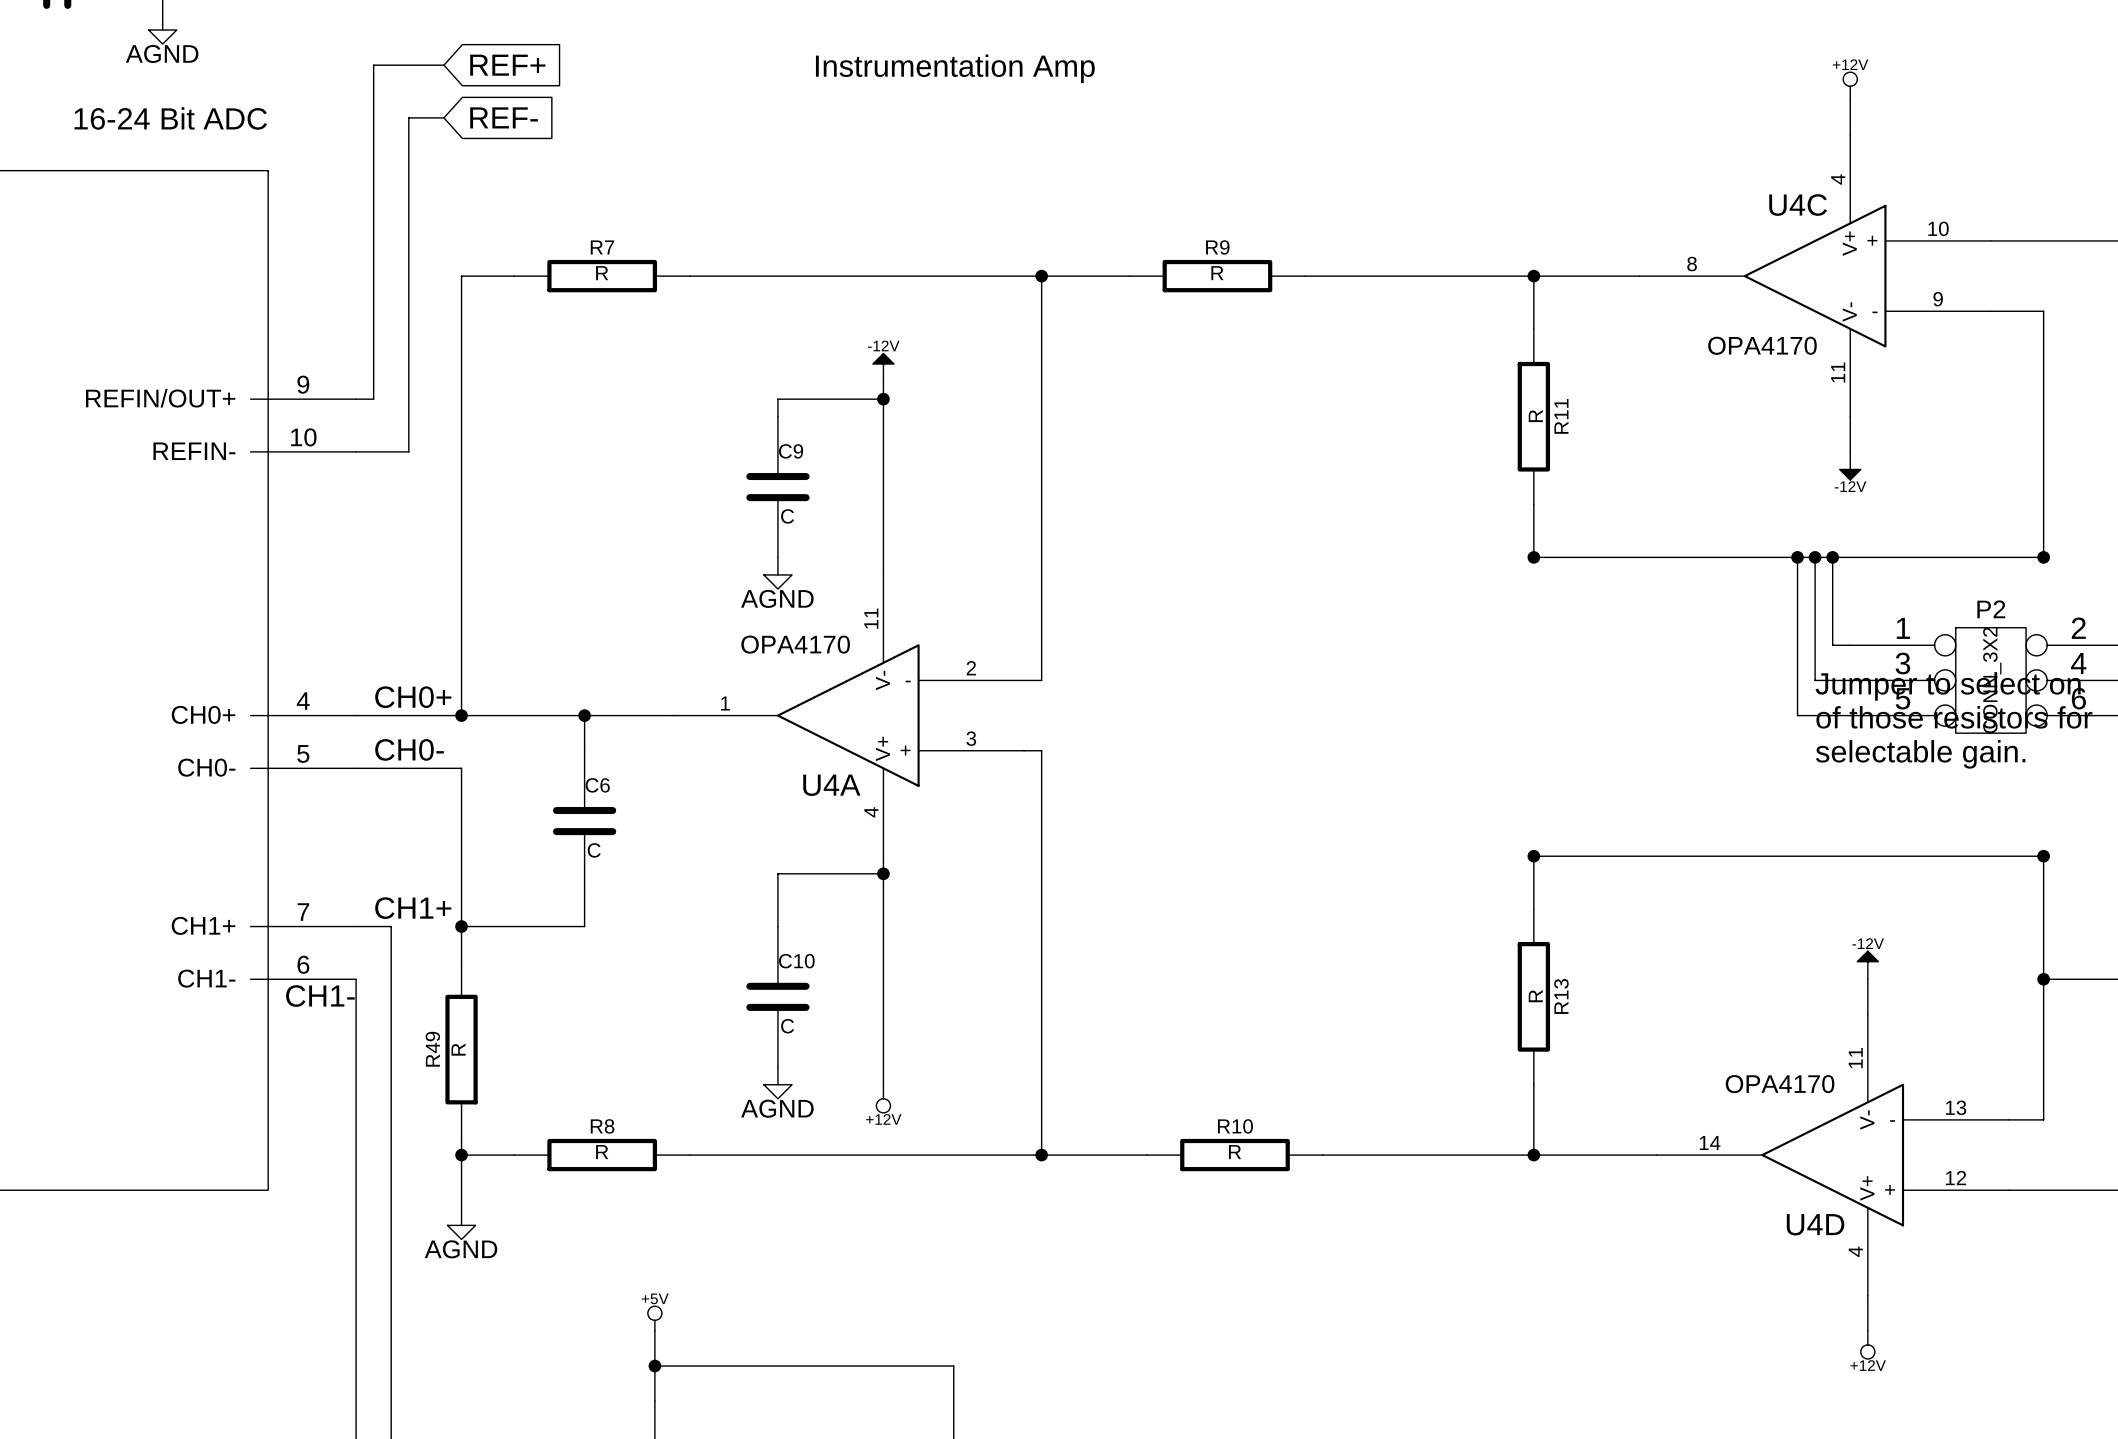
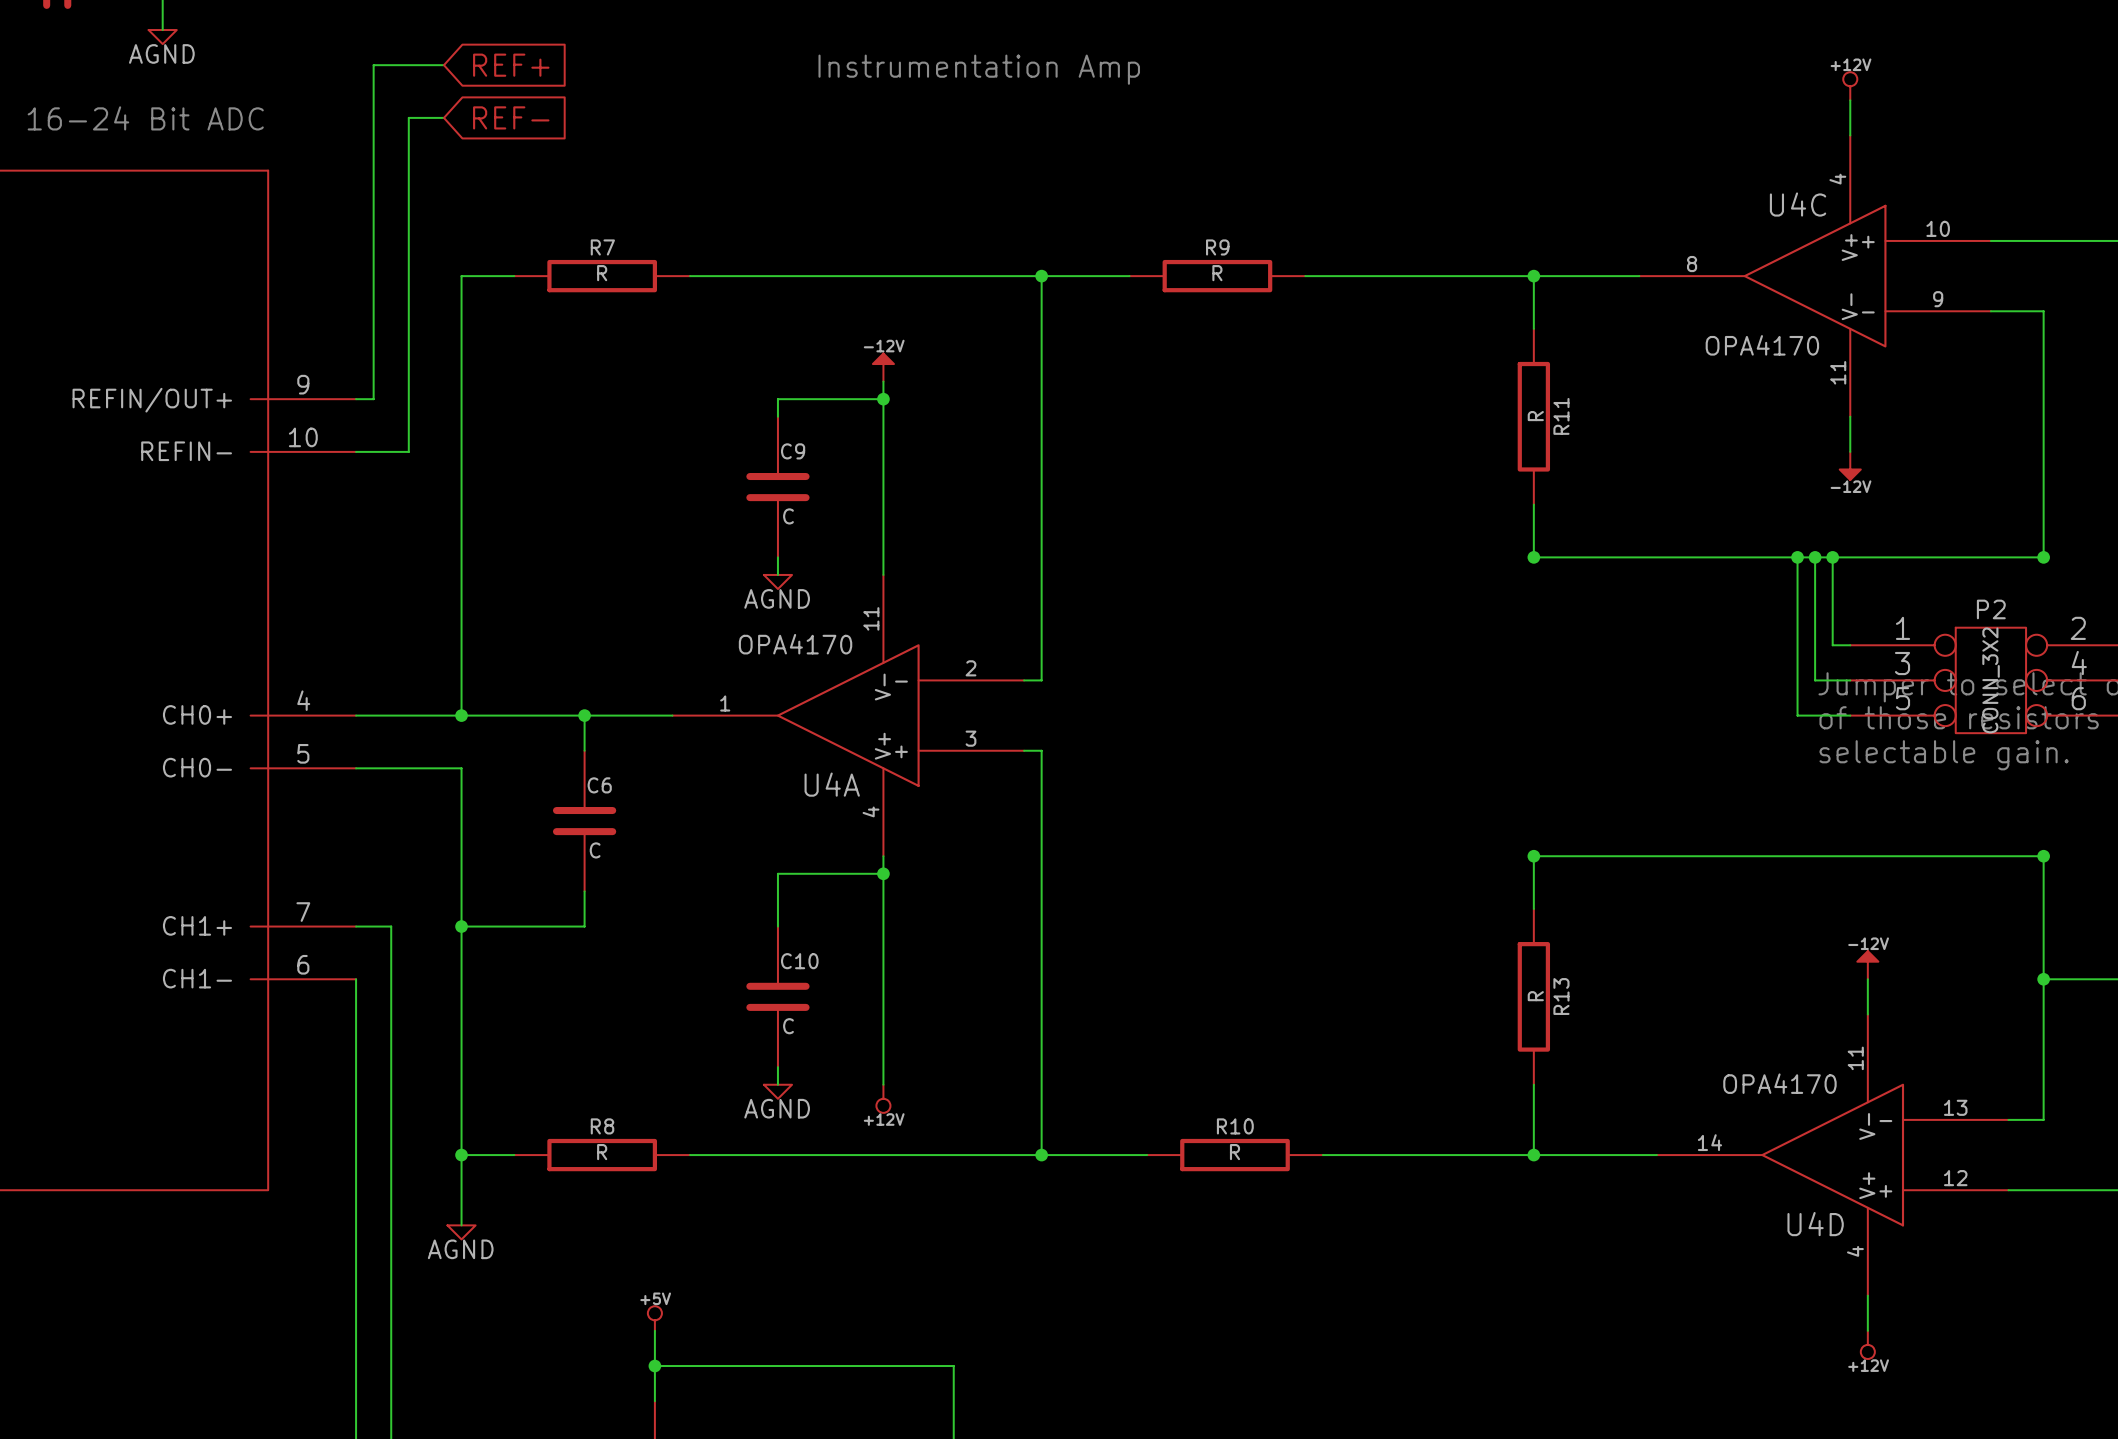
label: CH0+ (413, 697) -> none
label: CH0- (409, 749) -> none
label: CH1+ (413, 908) -> none
wire: none -> (461, 961) (461, 1137)
label: CH1- (320, 996) -> none
R49: R (461, 1049) -> none

